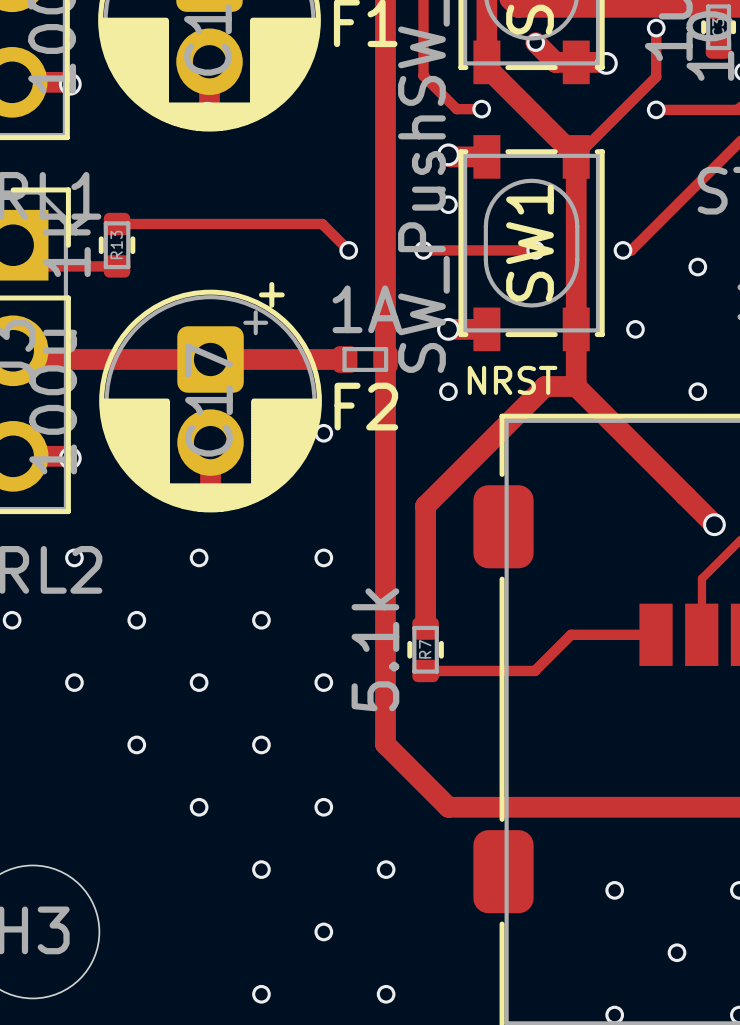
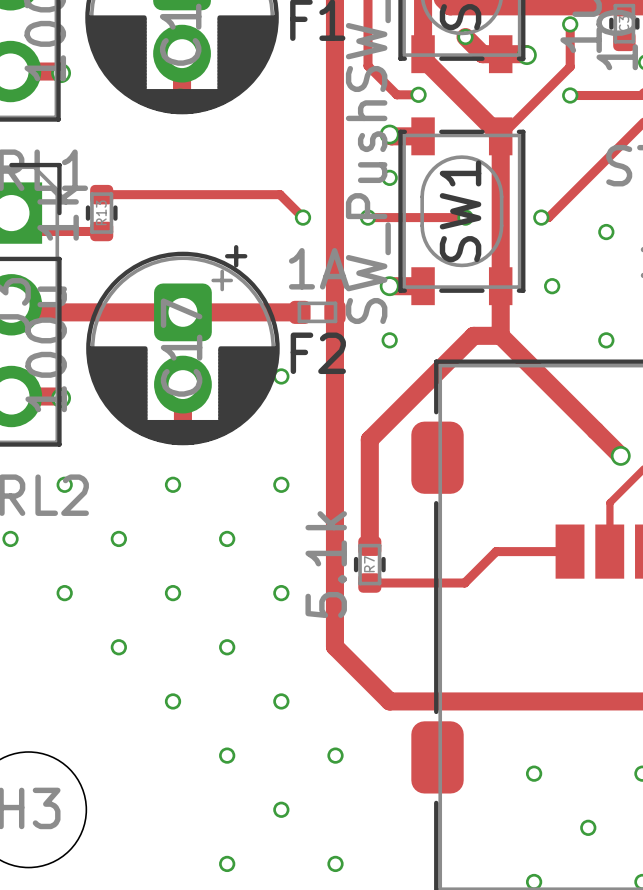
text: NRST (512, 380) -> none

